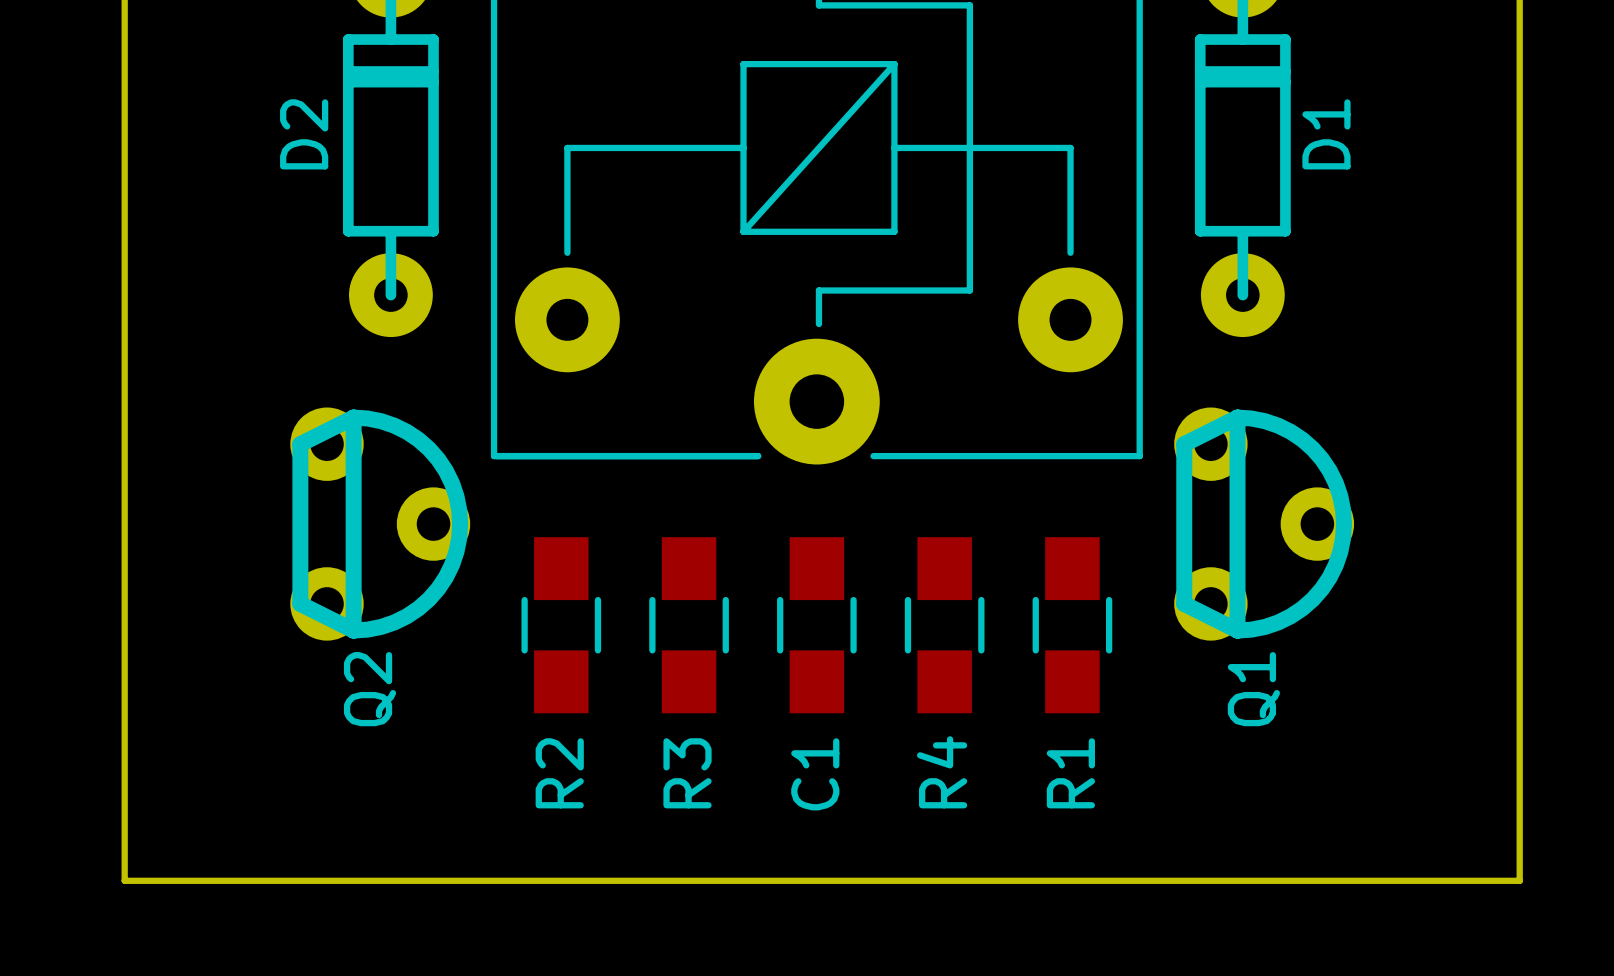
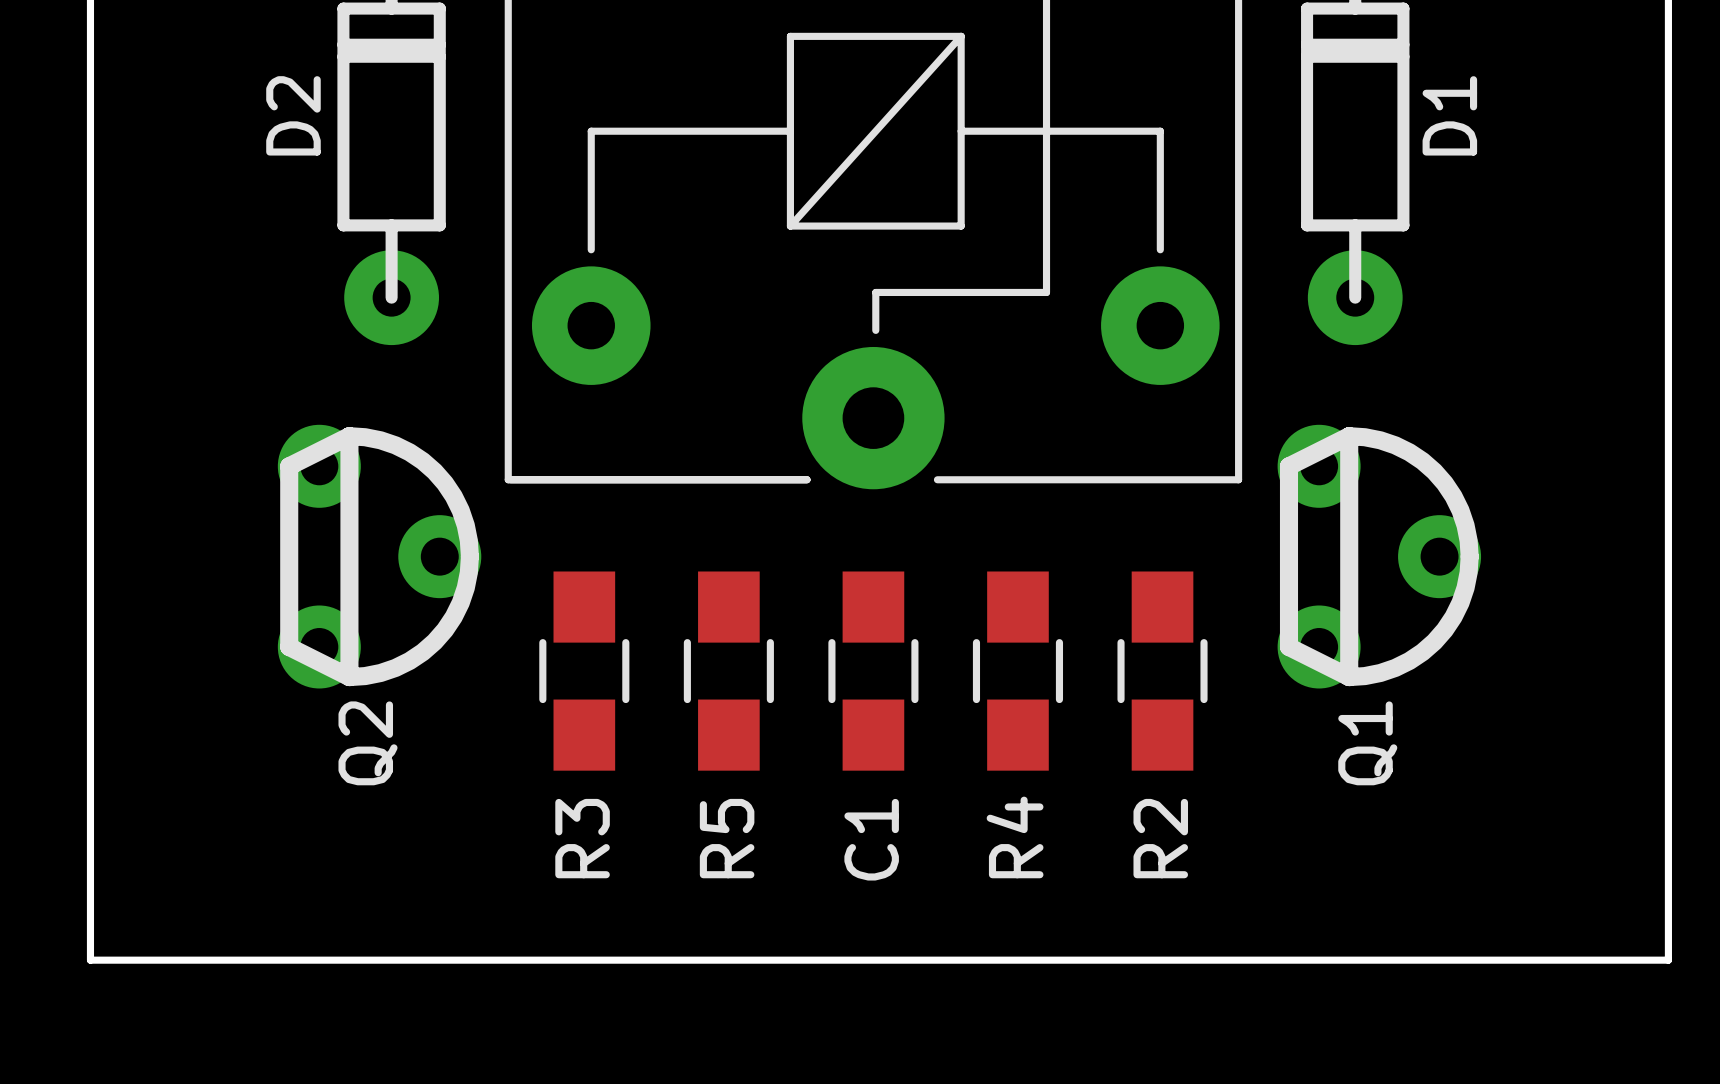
R2 name: R2 (559, 773) -> R3 (582, 838)
R3 name: R3 (687, 773) -> R5 (727, 838)
R1 name: R1 (1070, 773) -> R2 (1160, 838)

